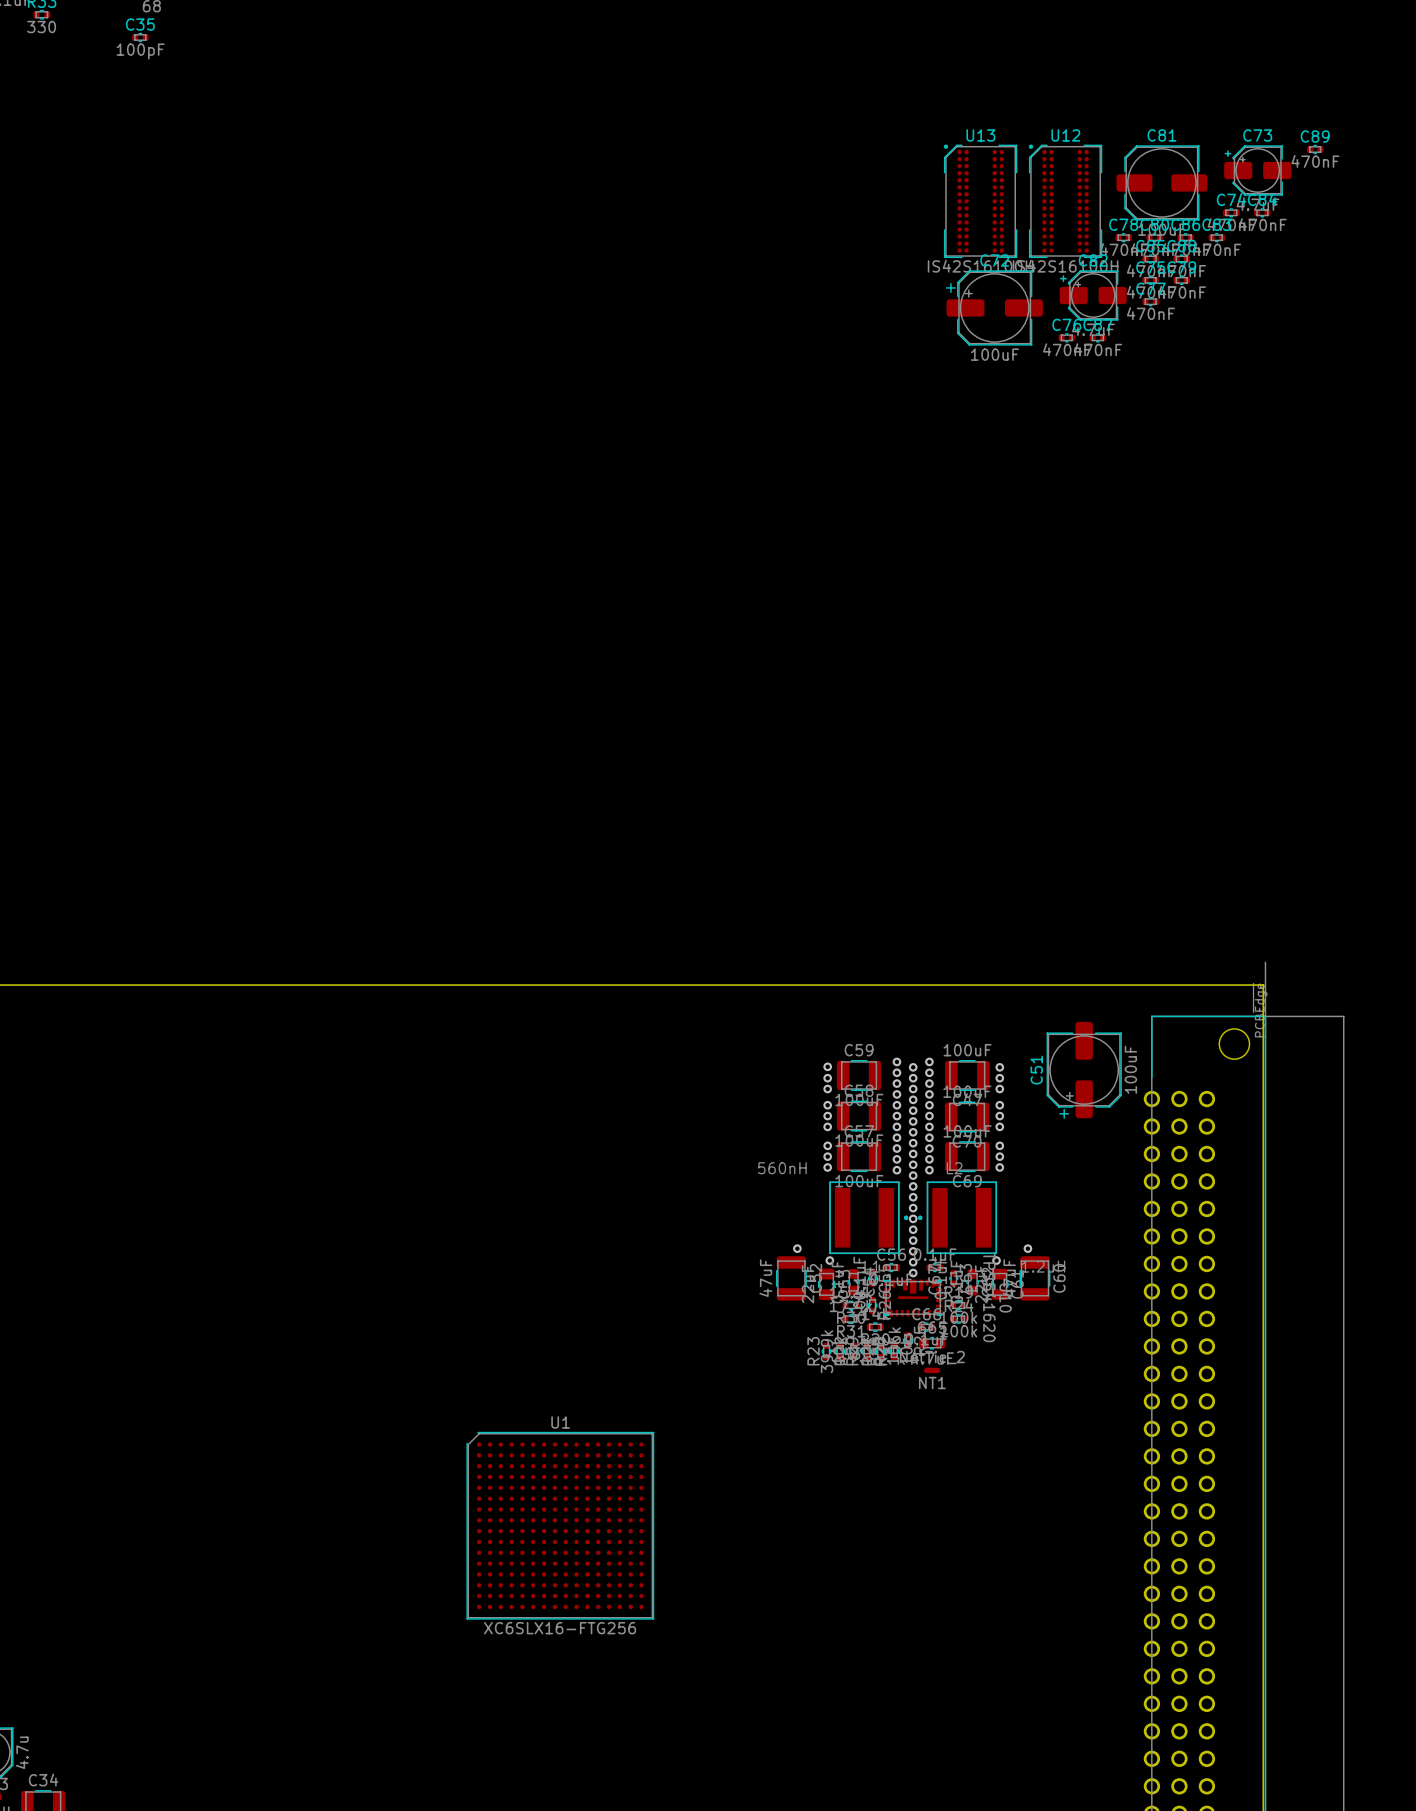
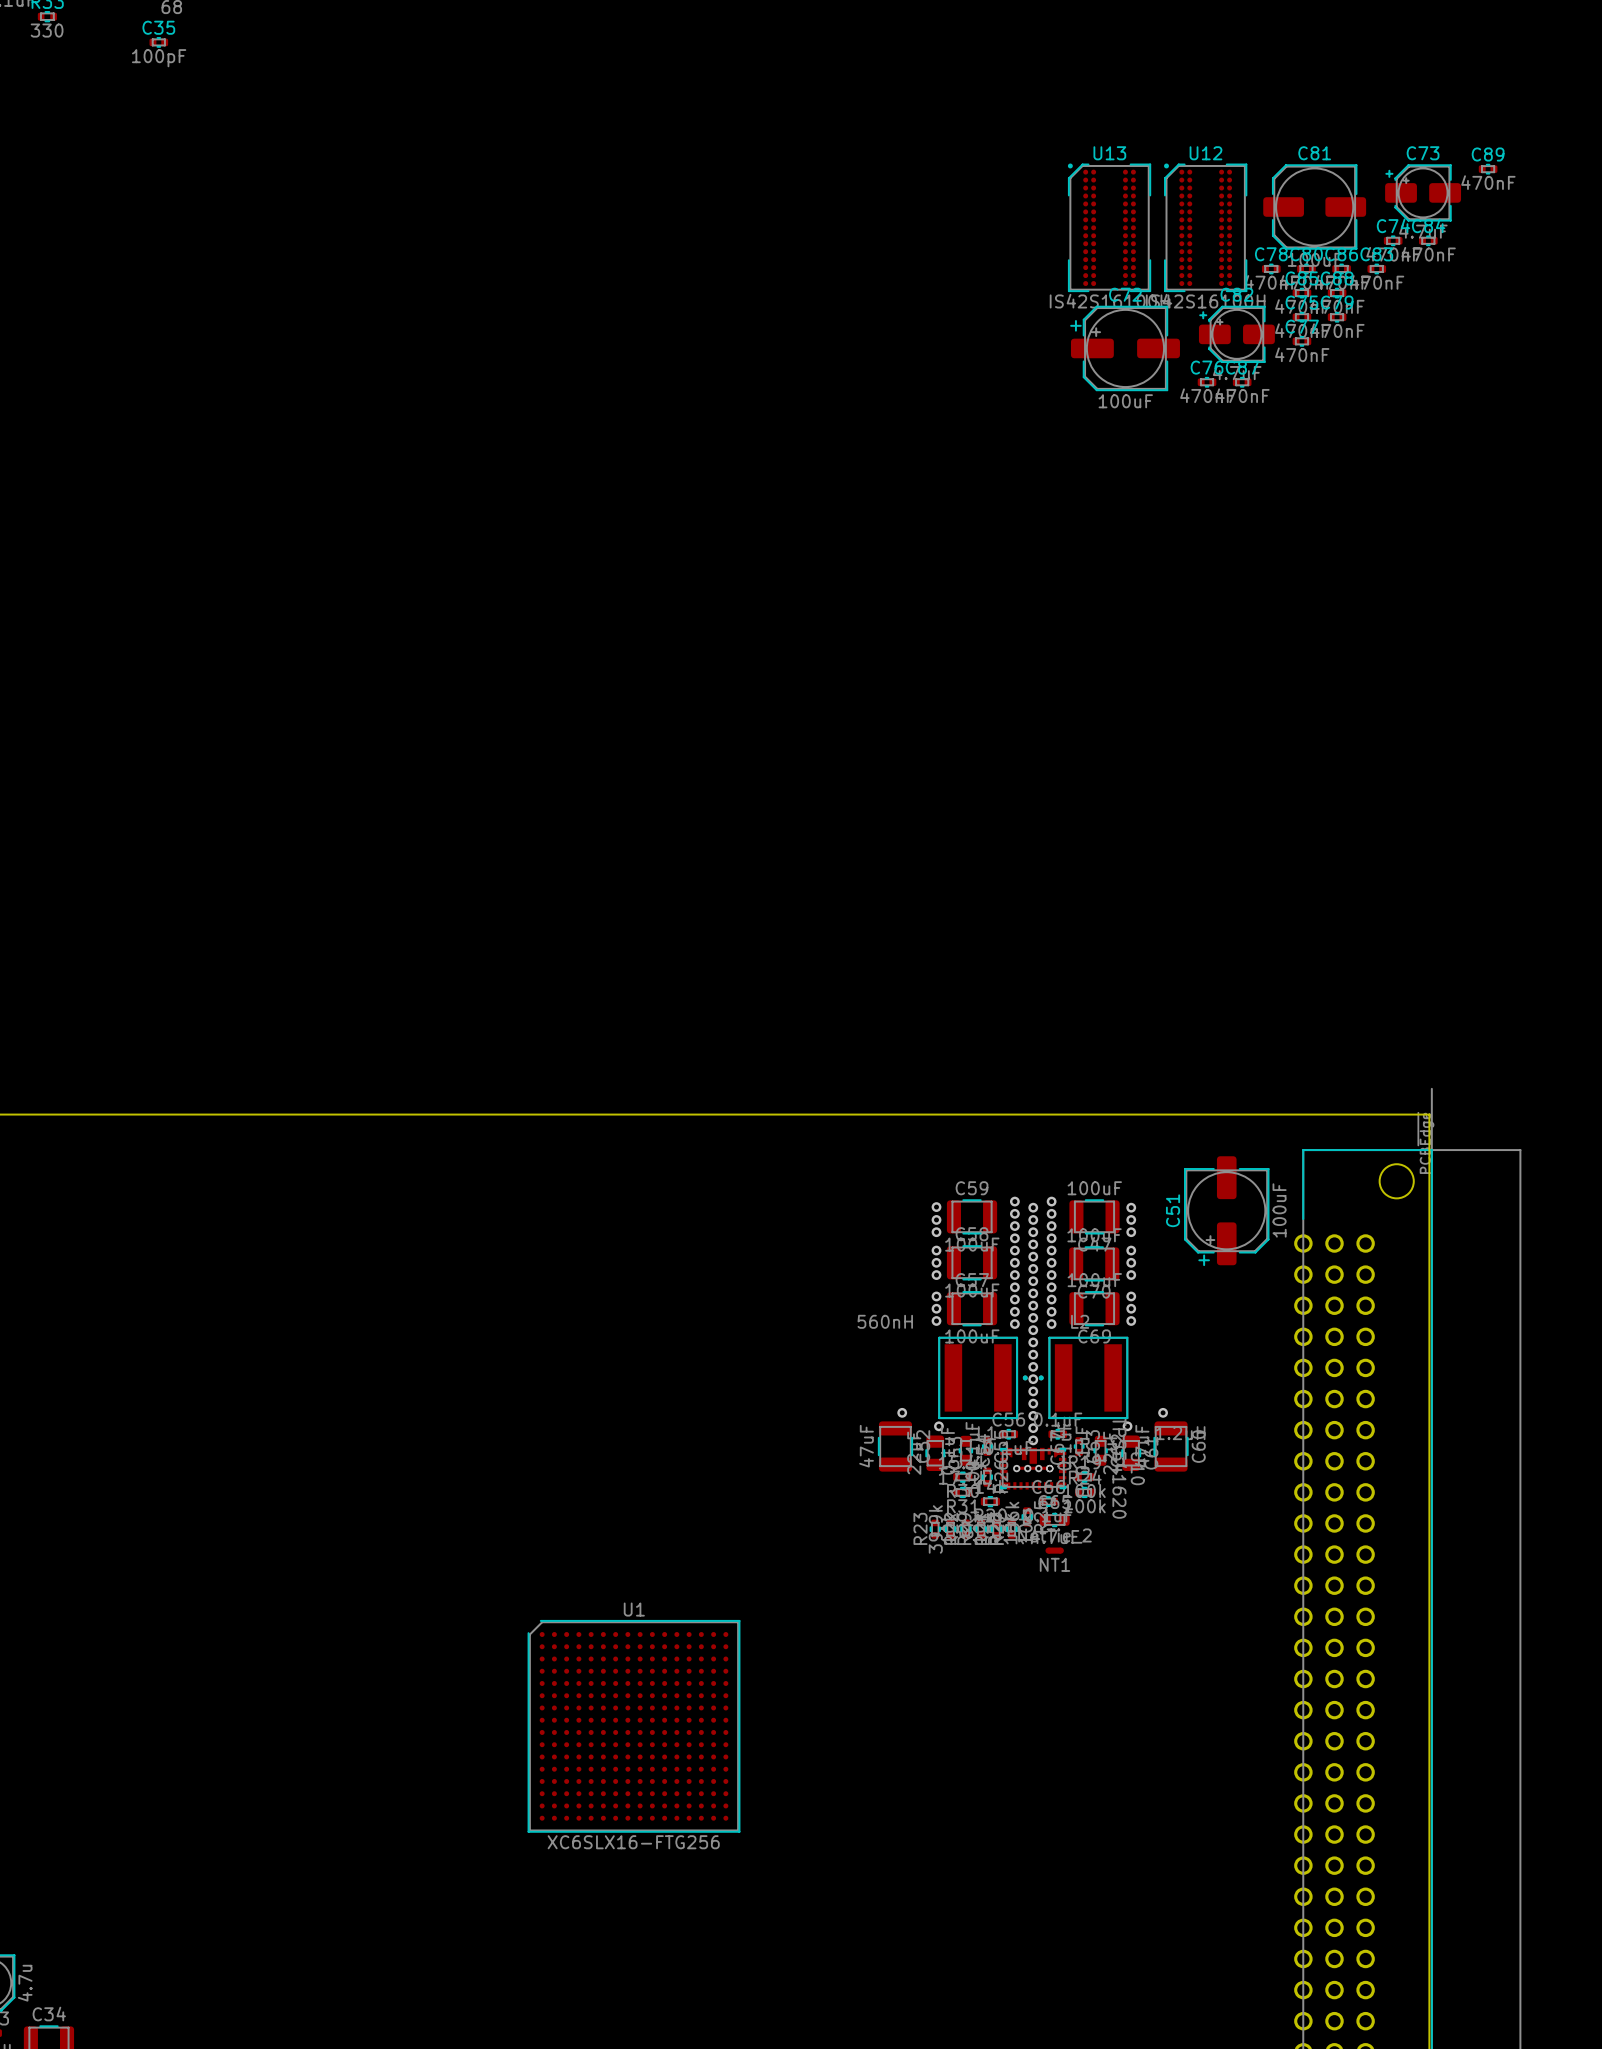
via: none -> (1016, 1468)
via: none -> (1027, 1468)
via: none -> (1038, 1468)
via: none -> (1049, 1468)

